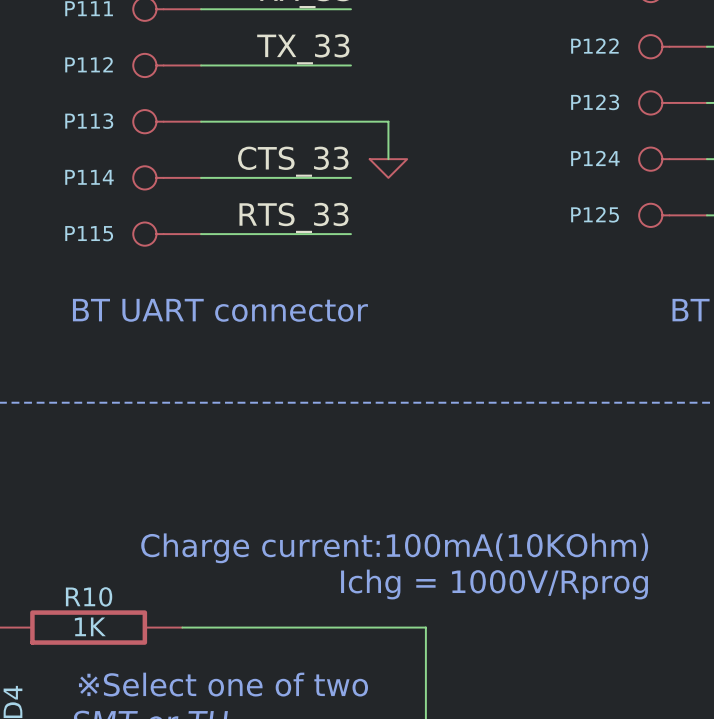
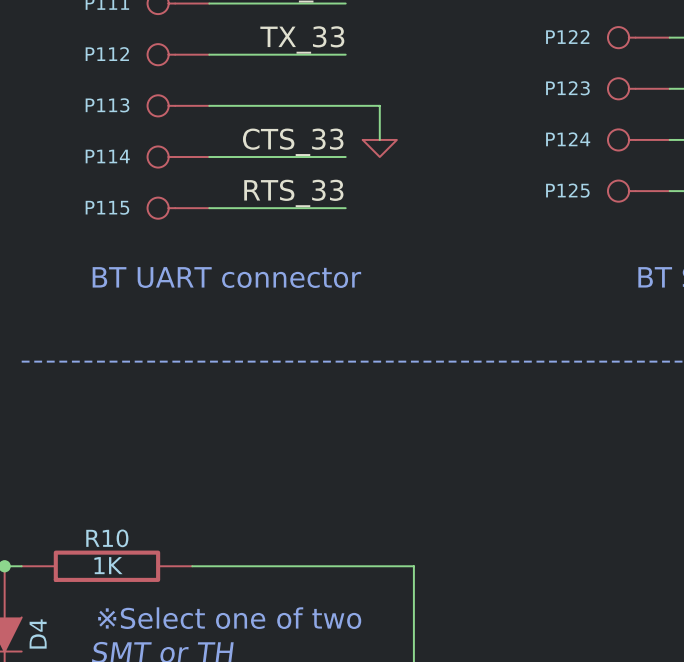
text: Charge current:100mA(10KOhm) (394, 548) -> none
text: Ichg = 1000V/Rprog (494, 584) -> none

